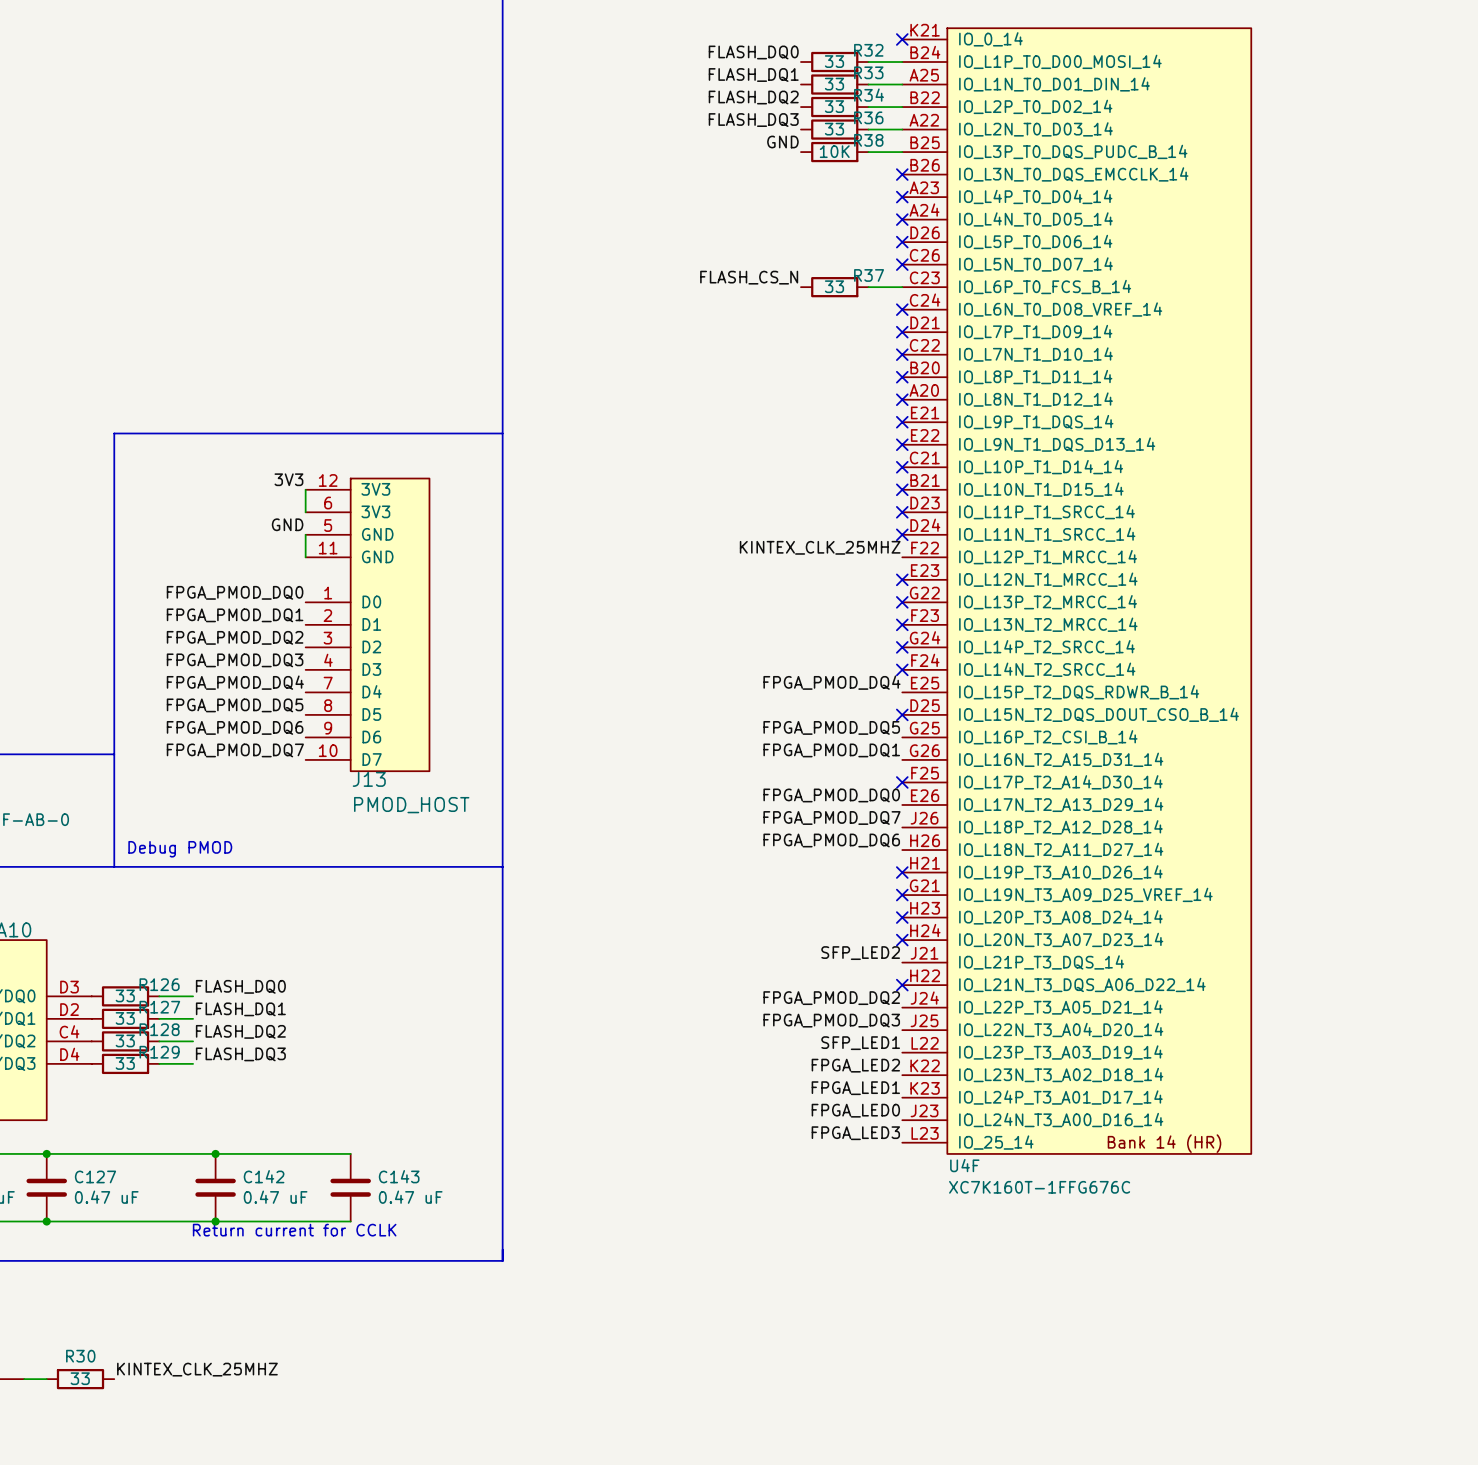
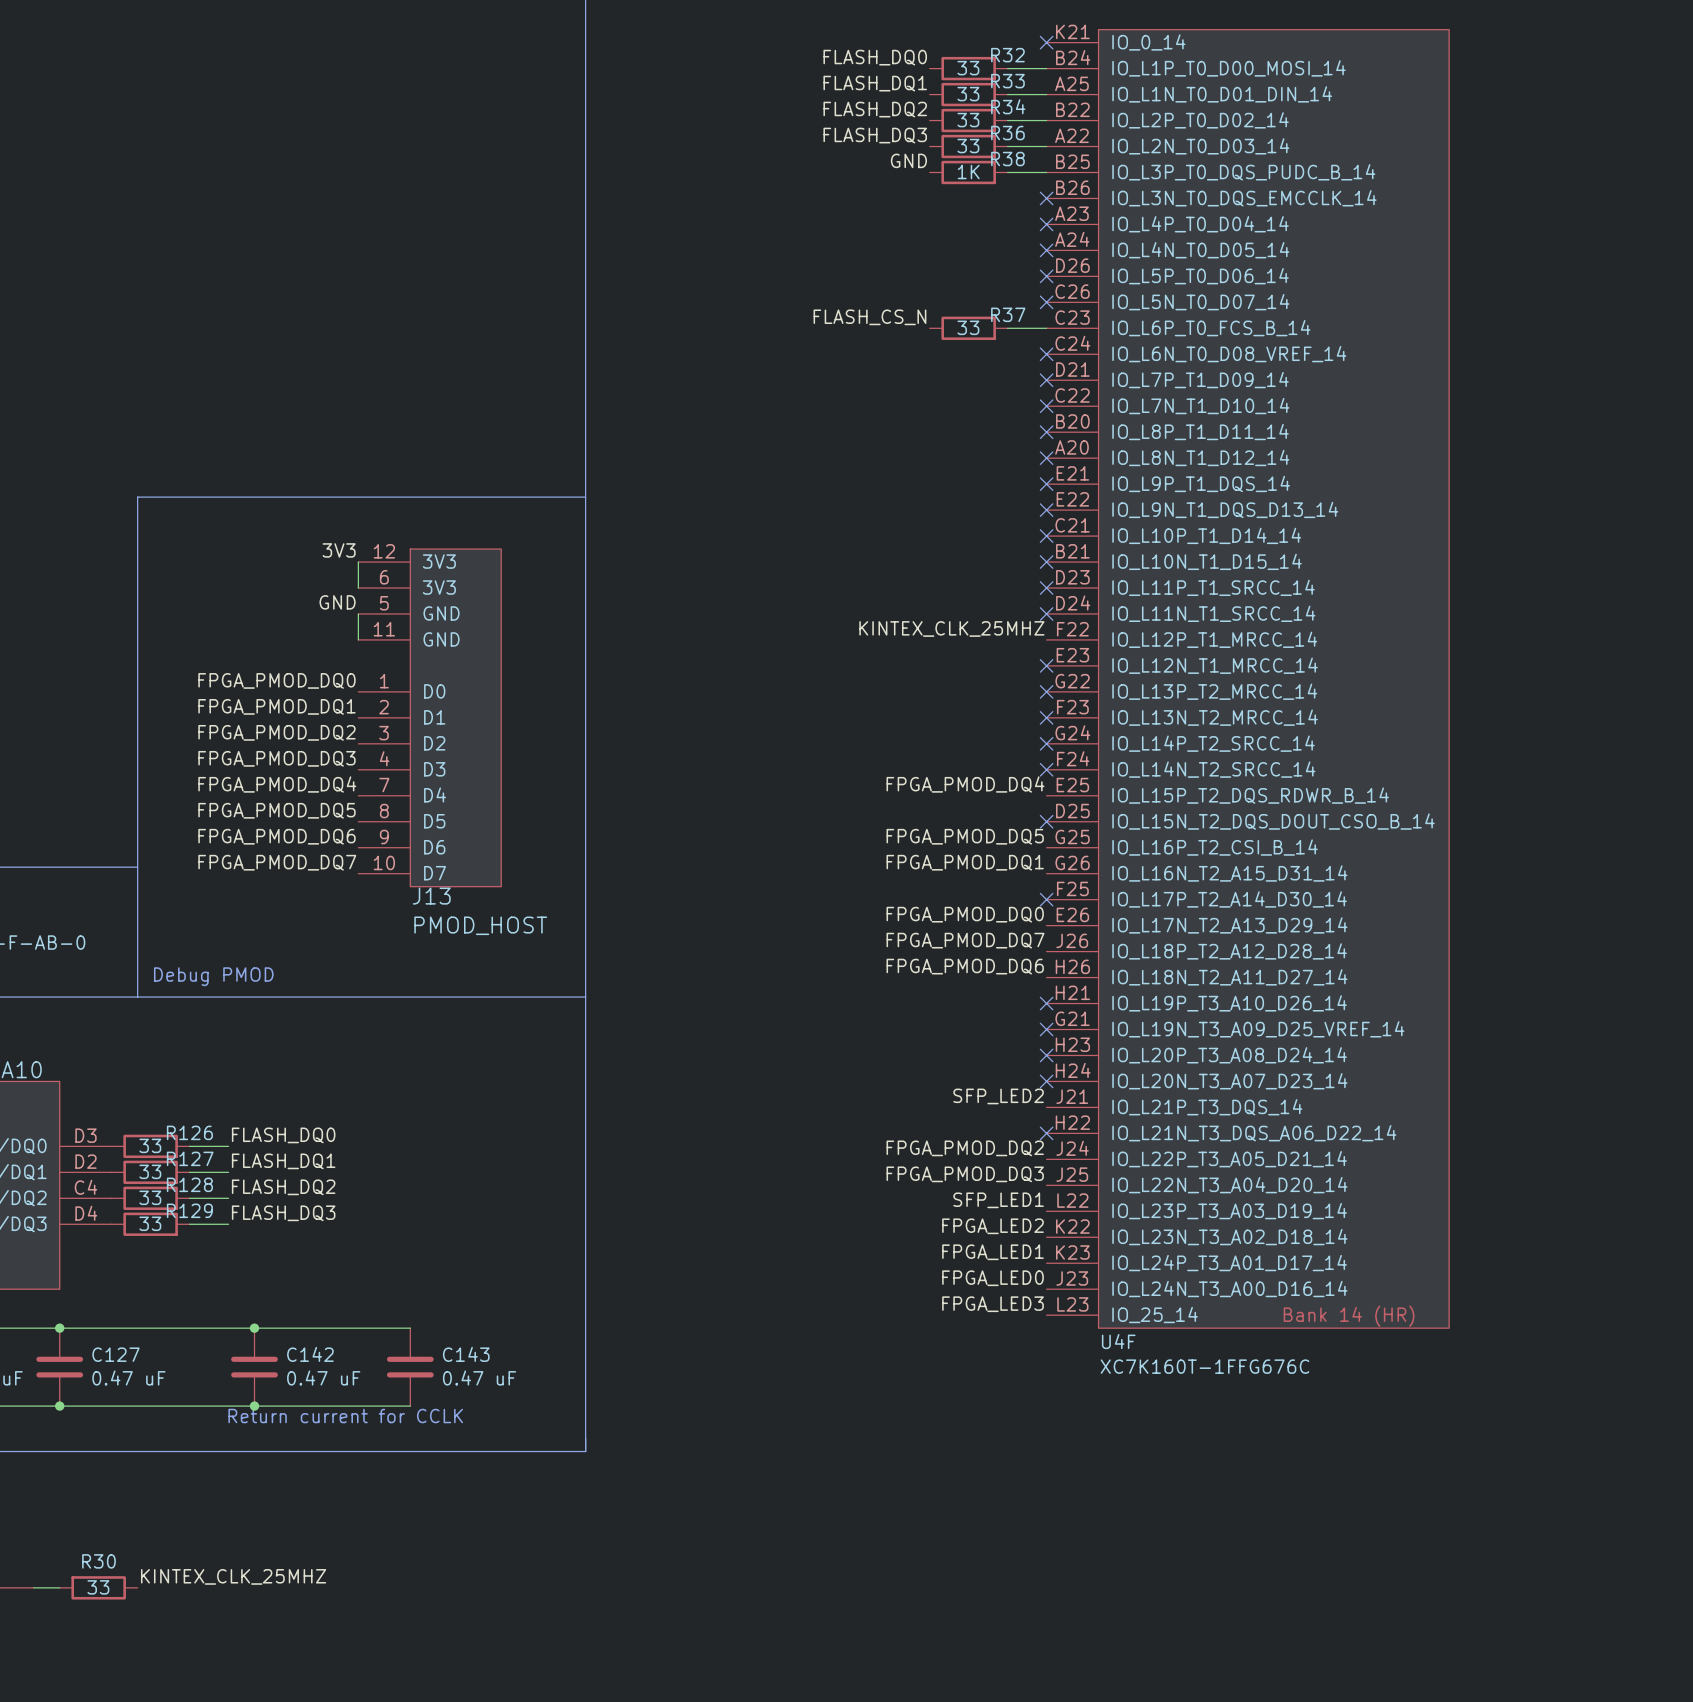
R38 value: 10K (834, 151) -> 1K (968, 172)

